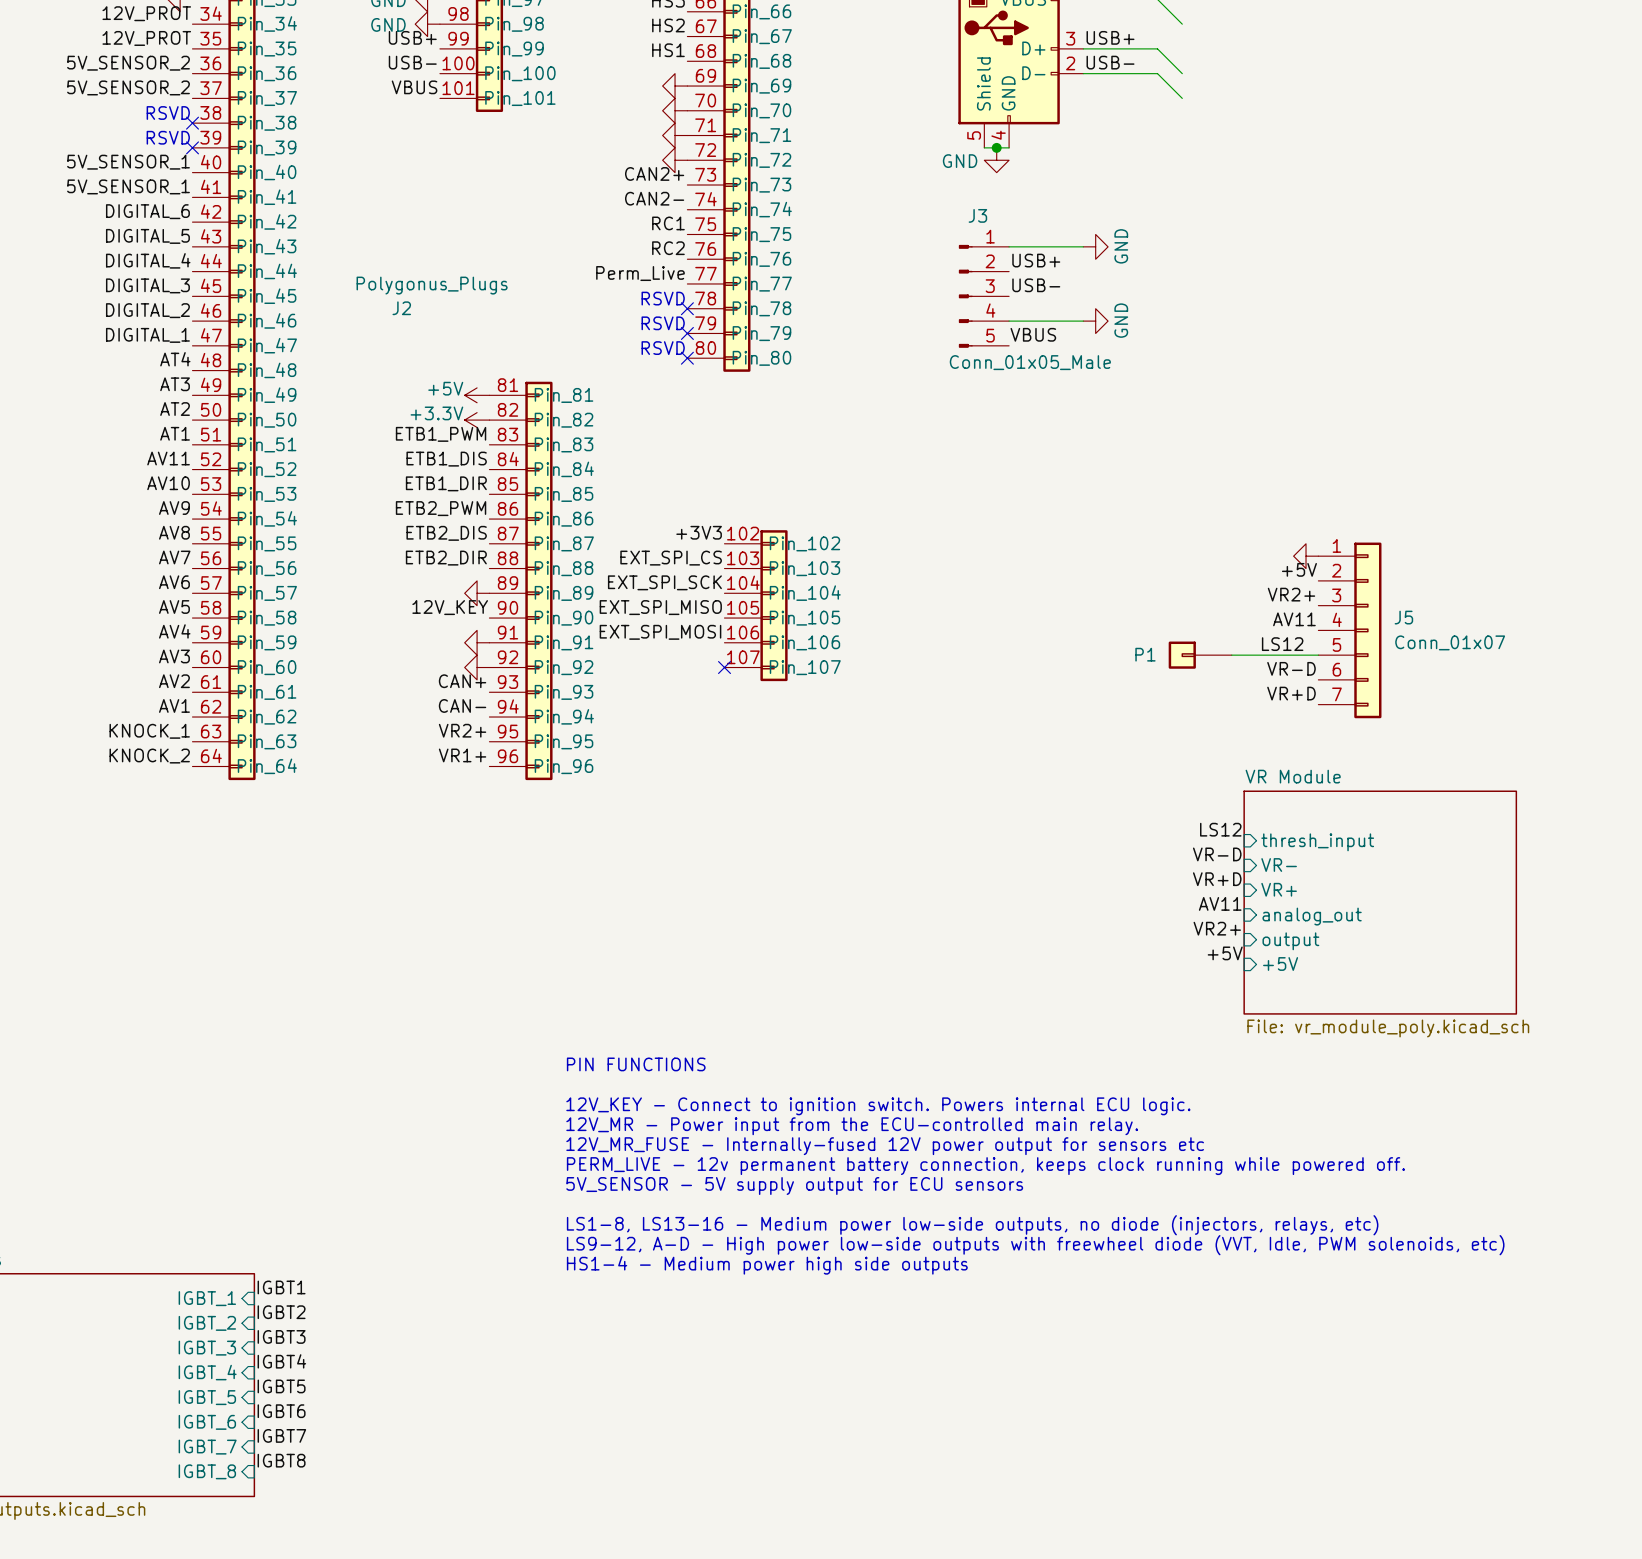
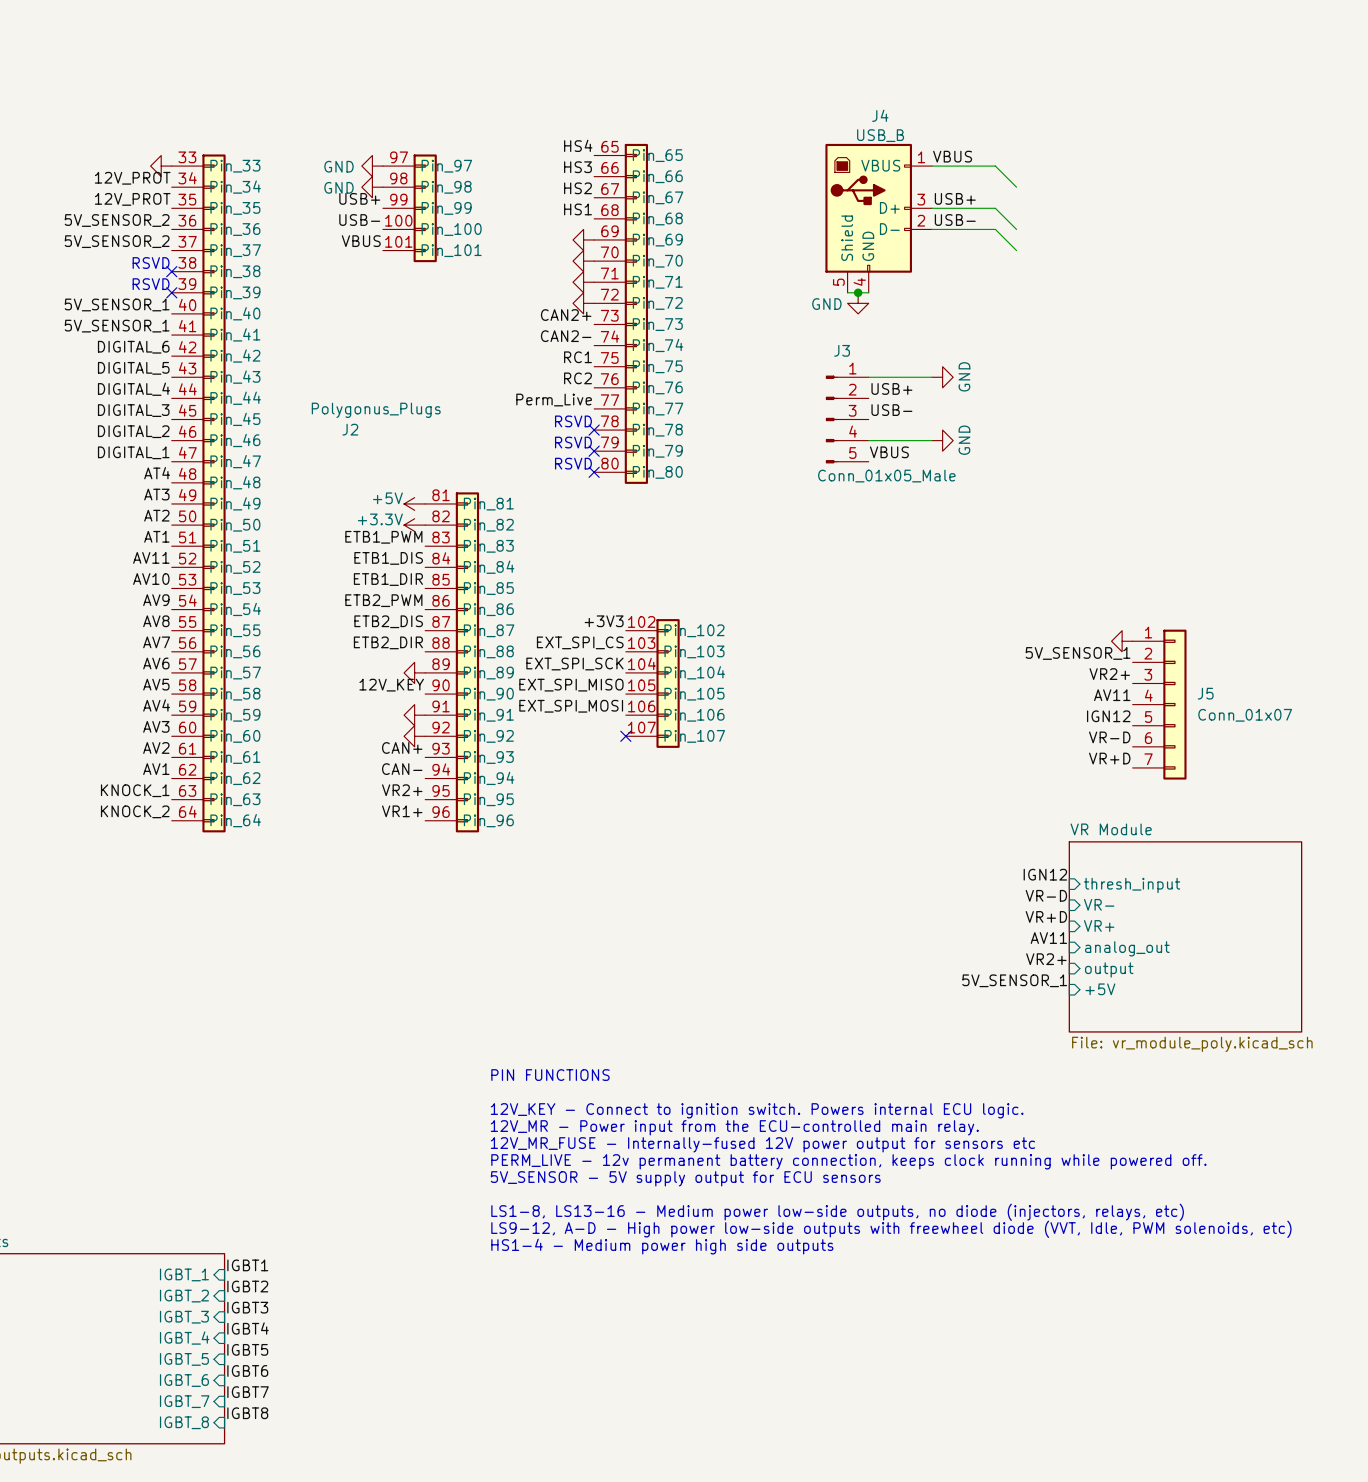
label: +5V (1299, 569) -> 5V_SENSOR_1 (1078, 653)
label: LS12 (1282, 644) -> none
label: none -> IGN12 (1108, 716)
P1: (1200, 655) -> none
wire: (1231, 655) (1318, 655) -> none
label: LS12 (1220, 829) -> IGN12 (1045, 874)
label: +5V (1225, 953) -> 5V_SENSOR_1 (1014, 980)

